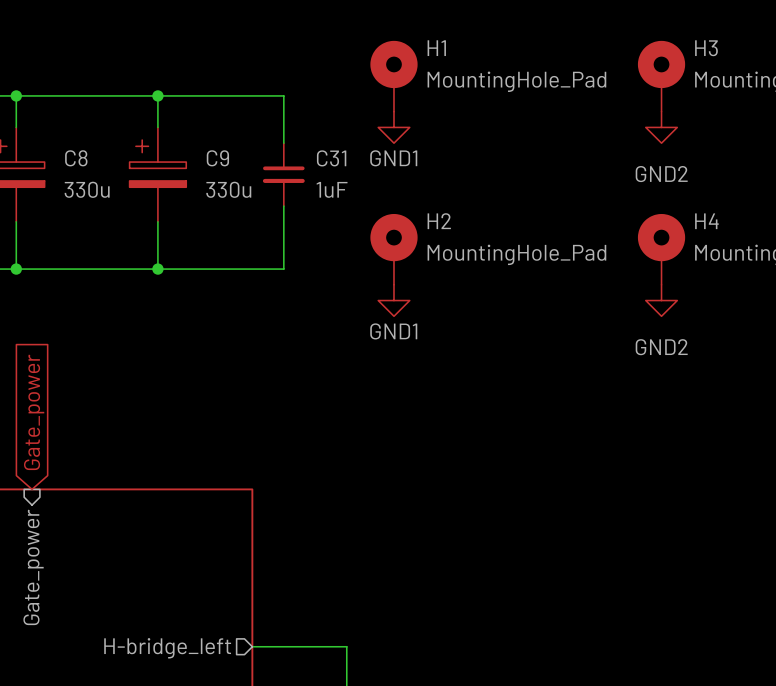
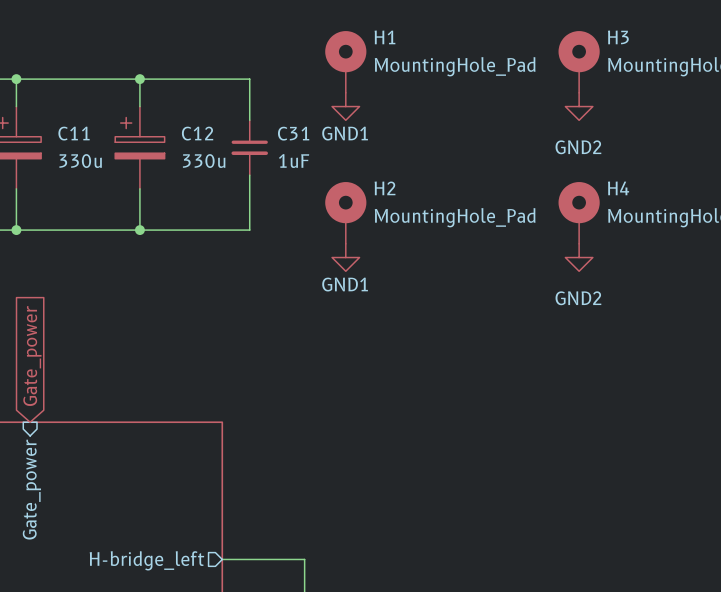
C8 name: C8 (76, 158) -> C11 (74, 133)
C9 name: C9 (217, 158) -> C12 (197, 133)

